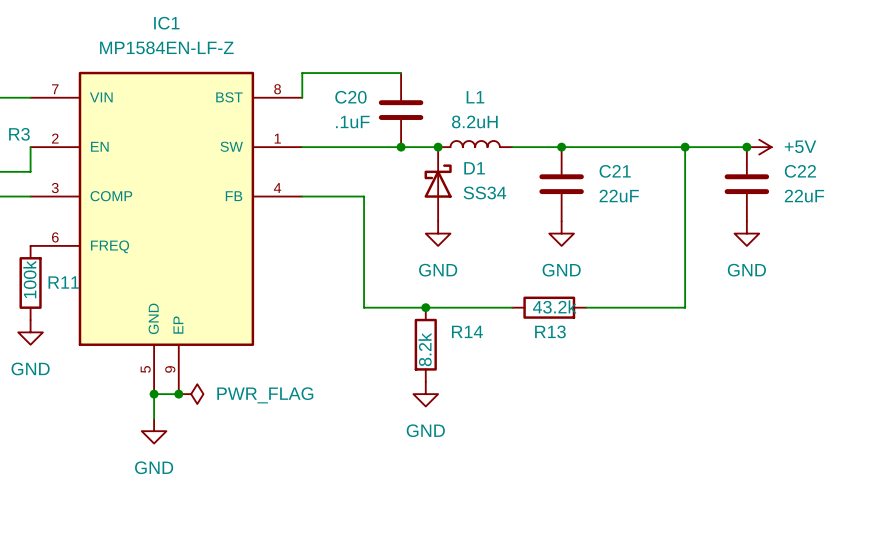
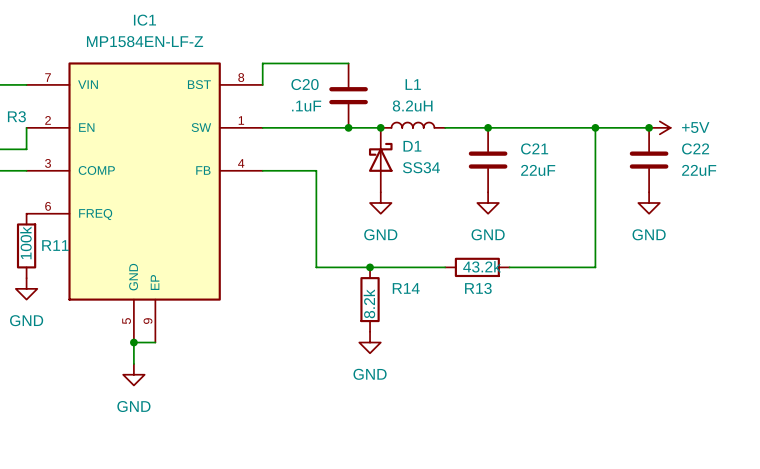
junction: (178, 394) -> none
power symbol: PWR_FLAG (191, 394) -> none

